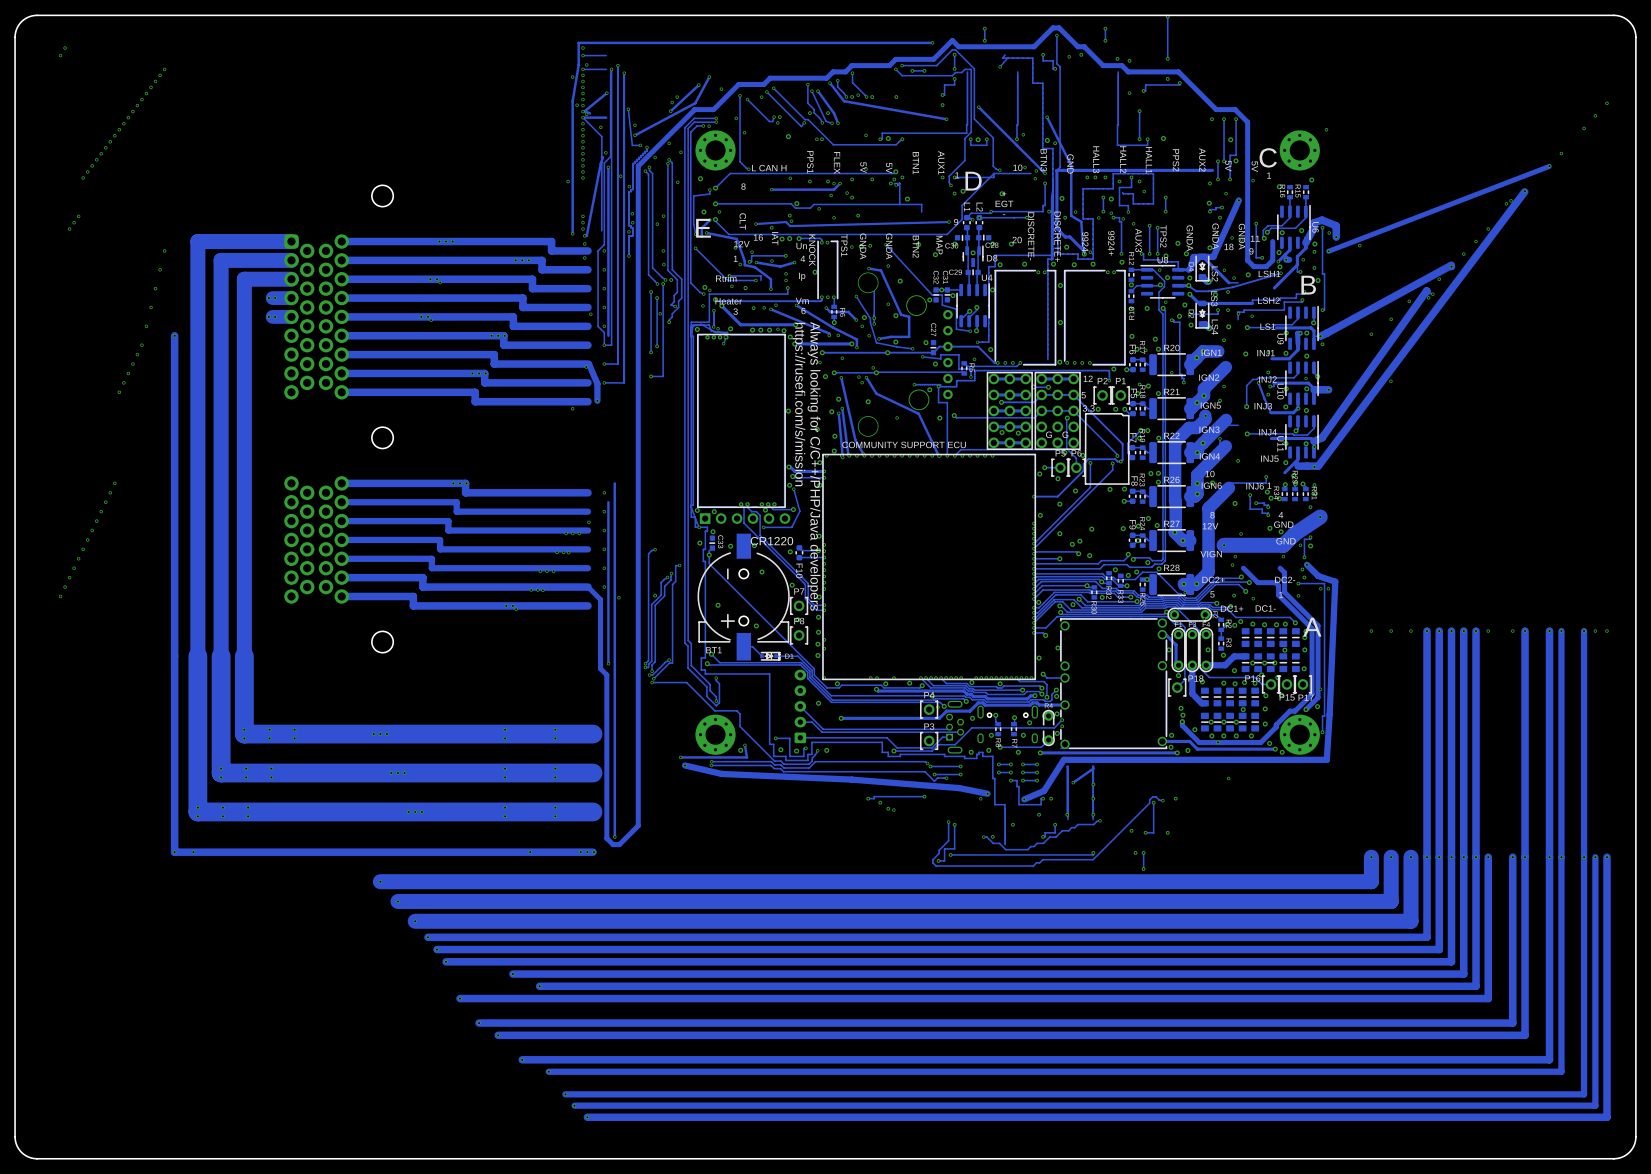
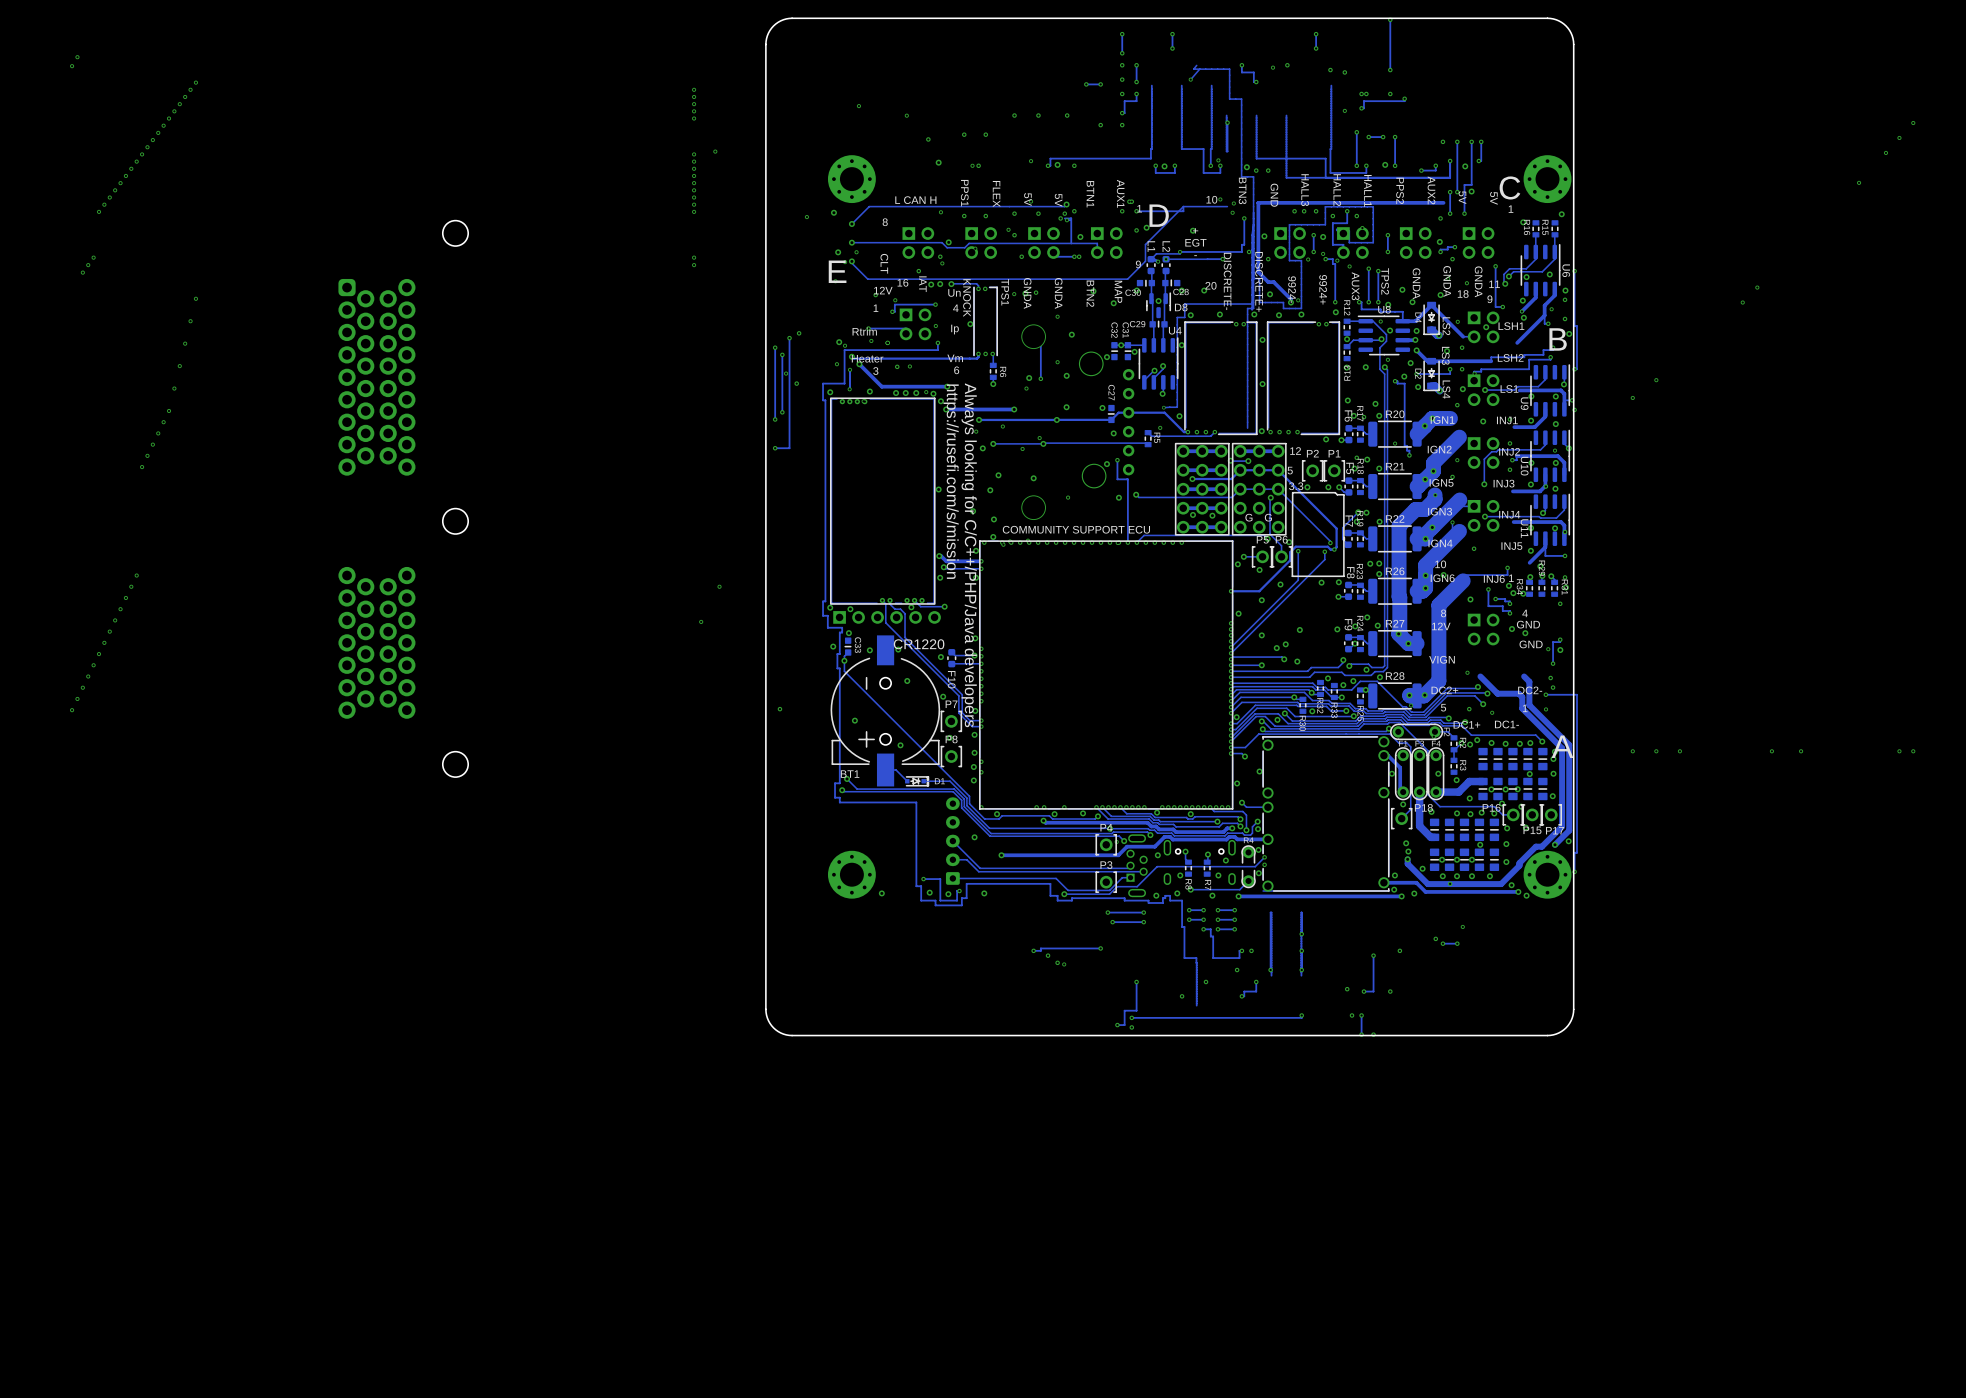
board edge: (1299, 15) (1613, 15) (1625, 18) (1634, 30) (1635, 1136) (1633, 1146) (1629, 1152) (1623, 1156) (1613, 1158) (37, 1158) (25, 1155) (18, 1148) (15, 1136) (15, 37) (18, 25) (25, 18) (37, 15) (665, 15) -> (1547, 18) (1558, 20) (1566, 25) (1572, 35) (1573, 44) (1573, 1009) (1572, 1018) (1566, 1027) (1558, 1032) (1547, 1035) (792, 1035) (780, 1032) (771, 1025) (765, 1009) (765, 44) (767, 35) (773, 25) (783, 19) (792, 18)
track: none -> (1122, 34) (1122, 53)
via: none -> (1122, 34)
track: (1056, 35) (1056, 63) (1060, 66) (1060, 167) (1056, 170) -> none
via: (1056, 35) -> none
track: (932, 42) (578, 42) (578, 64) (572, 101) (572, 233) -> none
via: (932, 42) -> none
via: none -> (1122, 53)
via: (582, 48) -> none
via: none -> (1122, 65)
via: (582, 55) -> none
track: (606, 55) (582, 55) -> none
via: (586, 64) -> none
track: (617, 65) (617, 364) (604, 364) -> none
via: (617, 65) -> none
track: (902, 65) (936, 65) (952, 49) (955, 49) (974, 68) (974, 119) (993, 137) (993, 166) (999, 170) -> none
via: (902, 65) -> none
via: none -> (1122, 79)
via: (582, 69) -> none
track: (606, 69) (582, 69) -> none
track: (611, 69) (610, 156) (604, 163) (604, 244) (598, 250) (598, 326) (604, 332) (604, 345) (611, 345) (611, 69) -> none
via: (611, 69) -> none
track: (895, 69) (902, 75) (952, 75) (955, 72) (971, 69) (971, 132) (964, 138) (964, 160) (949, 176) (951, 185) -> none
via: (895, 69) -> none
track: none -> (1181, 85) (1181, 149) (1203, 149) (1203, 172) (1220, 172) (1220, 165)
track: (624, 73) (624, 382) (604, 382) -> none
via: (624, 73) -> none
track: (852, 73) (852, 82) (866, 97) -> none
via: (852, 73) -> none
via: (572, 77) -> none
track: (709, 77) (695, 103) (634, 135) -> none
via: (709, 77) -> none
via: none -> (1122, 93)
via: none -> (1361, 93)
via: none -> (1366, 93)
track: (837, 80) (837, 86) (846, 97) -> none
via: (837, 80) -> none
track: (830, 83) (844, 101) (946, 119) -> none
via: (830, 83) -> none
track: (807, 84) (807, 103) (822, 122) -> none
via: (807, 84) -> none
track: (698, 85) (670, 111) -> none
via: (698, 85) -> none
track: (773, 88) (833, 144) (896, 144) (902, 139) -> none
via: (773, 88) -> none
track: (811, 91) (825, 121) (832, 123) -> none
via: (811, 91) -> none
track: (817, 91) (834, 113) (838, 123) -> none
via: (817, 91) -> none
track: (766, 92) (801, 126) (804, 122) -> none
via: (766, 92) -> none
track: (606, 93) (584, 111) (589, 113) -> none
via: (606, 93) -> none
track: (740, 95) (740, 161) (748, 169) -> none
via: (740, 95) -> none
via: (858, 95) -> none
via: (677, 97) -> none
via: (846, 97) -> none
via: (866, 97) -> none
track: none -> (1226, 115) (1226, 151) (1227, 122)
track: none -> (1256, 115) (1256, 158) (1325, 158) (1325, 177)
track: none -> (1286, 115) (1286, 177) (1450, 177) (1450, 161)
track: (747, 99) (769, 121) (772, 121) (774, 117) -> none
via: (747, 99) -> none
via: (672, 102) -> none
via: none -> (1227, 122)
via: (577, 105) -> none
via: (582, 105) -> none
via: none -> (1100, 125)
track: (978, 107) (1045, 173) -> none
via: (978, 107) -> none
track: (628, 109) (632, 145) (640, 145) -> none
via: (628, 109) -> none
via: (582, 111) -> none
via: (670, 111) -> none
via: (586, 114) -> none
via: none -> (1368, 137)
track: none -> (1383, 137) (1368, 137)
via: none -> (1383, 137)
track: none -> (1395, 137) (1395, 165)
via: none -> (1395, 137)
via: (582, 117) -> none
track: (606, 117) (582, 117) (601, 136) (601, 230) -> none
via: (774, 117) -> none
track: (1047, 117) (1071, 165) (1071, 215) (1081, 221) (1083, 251) (1083, 248) -> none
via: (1047, 117) -> none
track: (716, 118) (694, 118) (684, 127) (684, 642) (688, 646) (688, 668) (706, 686) (706, 696) (716, 705) (719, 702) (719, 683) (716, 678) -> none
via: (716, 118) -> none
via: (736, 118) -> none
via: (946, 119) -> none
track: none -> (1481, 141) (1481, 161) (1478, 161)
via: none -> (1481, 141)
track: (716, 122) (694, 122) (688, 128) (688, 640) (691, 643) (691, 665) (710, 684) (710, 690) (716, 697) (716, 701) -> none
via: (716, 122) -> none
via: (777, 122) -> none
via: (804, 122) -> none
via: (822, 122) -> none
via: (582, 123) -> none
via: (832, 123) -> none
via: (838, 123) -> none
via: (634, 125) -> none
track: (703, 125) (697, 125) (690, 132) (690, 282) (703, 294) -> none
via: (703, 125) -> none
via: (709, 126) -> none
via: (1326, 129) -> none
via: (744, 132) -> none
via: (634, 135) -> none
via: none -> (1450, 161)
via: none -> (1478, 161)
via: none -> (1220, 165)
via: none -> (1395, 165)
track: none -> (1435, 165) (1435, 170) (1421, 170)
via: none -> (1435, 165)
via: (669, 143) -> none
via: none -> (1268, 170)
via: none -> (1421, 170)
via: (640, 145) -> none
track: (647, 147) (647, 151) (632, 163) (632, 189) (628, 191) (628, 225) (632, 227) (632, 235) (628, 235) (628, 255) -> none
via: (647, 147) -> none
via: (605, 152) -> none
via: (680, 152) -> none
track: (601, 157) (586, 235) (584, 235) -> none
via: (655, 157) -> none
track: (669, 159) (672, 163) (672, 269) (681, 279) (681, 298) (678, 301) (678, 307) (672, 313) (669, 322) -> none
via: (669, 159) -> none
track: (667, 163) (667, 270) (677, 279) (677, 292) (671, 304) (675, 306) -> none
via: (667, 163) -> none
track: (1549, 166) (1328, 251) -> none
via: (1549, 166) -> none
track: (608, 167) (608, 335) -> none
via: (608, 167) -> none
track: (649, 167) (652, 173) (652, 267) (665, 279) -> none
via: (649, 167) -> none
via: (748, 169) -> none
via: none -> (1129, 201)
via: none -> (1131, 201)
via: (999, 170) -> none
track: (645, 171) (648, 174) (648, 274) (657, 284) -> none
via: (645, 171) -> none
via: (1045, 173) -> none
via: (620, 176) -> none
via: (1252, 180) -> none
via: (568, 181) -> none
via: (834, 183) -> none
track: (840, 183) (834, 189) (771, 189) -> none
via: (840, 183) -> none
via: (951, 185) -> none
via: (629, 186) -> none
via: (771, 189) -> none
track: (709, 190) (709, 194) (693, 196) (695, 234) -> none
via: (709, 190) -> none
track: (1524, 191) (1318, 466) (1298, 466) -> none
via: (1525, 191) -> none
via: (1226, 193) -> none
via: (831, 195) -> none
track: (1238, 200) (1213, 256) (1193, 256) (1188, 269) -> none
via: (1238, 200) -> none
via: (1511, 200) -> none
via: (1506, 203) -> none
part: none -> (918, 243)
part: none -> (981, 243)
part: none -> (1043, 243)
part: none -> (1106, 243)
part: none -> (1290, 243)
part: none -> (1352, 243)
part: none -> (1415, 243)
part: none -> (1478, 243)
track: none -> (1053, 252) (1053, 256) (1074, 256)
via: (1075, 212) -> none
via: (632, 213) -> none
via: none -> (1074, 256)
via: none -> (1079, 256)
via: (663, 216) -> none
via: (834, 217) -> none
track: (709, 220) (701, 228) (701, 236) -> none
via: (632, 222) -> none
track: (948, 222) (790, 226) (786, 222) (755, 224) -> none
via: (948, 222) -> none
via: (657, 224) -> none
via: (755, 224) -> none
via: (582, 228) -> none
via: (1488, 228) -> none
via: (628, 231) -> none
track: (706, 232) (736, 239) (744, 265) (754, 267) (770, 279) (770, 289) -> none
via: (706, 232) -> none
via: (1329, 232) -> none
via: (572, 233) -> none
via: (695, 234) -> none
via: (584, 235) -> none
track: (1336, 237) (1336, 225) (1322, 220) (1313, 223) (1313, 228) (1305, 242) -> none
via: (1336, 237) -> none
via: (1241, 239) -> none
track: (291, 241) (197, 241) (197, 811) (593, 811) -> none
track: (341, 241) (551, 241) (551, 250) (588, 250) -> none
via: (439, 241) -> none
via: (446, 241) -> none
via: (452, 241) -> none
track: (1272, 241) (1272, 260) (1266, 266) (1253, 266) (1247, 260) (1247, 122) (1235, 109) (1216, 109) (1178, 71) (1128, 71) (1122, 65) (1103, 65) (1084, 46) (1078, 46) (1059, 27) (1052, 27) (1034, 46) (958, 46) (952, 40) (933, 59) (895, 59) (889, 65) (851, 65) (845, 71) (833, 71) (826, 78) (770, 78) (763, 84) (738, 84) (713, 109) (694, 109) (638, 166) (638, 825) (619, 844) (613, 844) (606, 838) (606, 675) (600, 668) (600, 599) (588, 587) (422, 587) (422, 577) (341, 577) -> none
via: (584, 243) -> none
track: (886, 244) (932, 295) (942, 295) (942, 305) (956, 309) (956, 329) (970, 331) -> none
via: (886, 244) -> none
via: (1359, 245) -> none
track: (695, 248) (727, 280) (755, 280) -> none
via: (695, 248) -> none
via: (604, 250) -> none
via: (663, 250) -> none
via: (1328, 251) -> none
via: (628, 255) -> none
track: (1284, 255) (1289, 259) (1286, 259) -> none
via: (584, 257) -> none
via: (1286, 259) -> none
track: (291, 260) (221, 260) (221, 773) (593, 773) -> none
track: (341, 260) (542, 260) (542, 269) (588, 269) -> none
via: (515, 260) -> none
via: (522, 260) -> none
via: (528, 260) -> none
via: (771, 261) -> none
via: (756, 262) -> none
track: (794, 262) (780, 266) (756, 262) -> none
via: (794, 262) -> none
via: (663, 264) -> none
via: (740, 264) -> none
track: (1451, 266) (1320, 336) -> none
via: (1451, 266) -> none
track: (868, 268) (881, 270) (901, 314) (909, 316) (909, 336) (879, 338) -> none
via: (868, 268) -> none
via: (604, 269) -> none
part: none -> (915, 324)
track: (1281, 273) (1232, 287) (1208, 291) (1196, 291) (1188, 285) -> none
via: (1281, 273) -> none
part: none -> (1483, 327)
via: (1234, 278) -> none
track: (291, 279) (244, 279) (244, 734) (593, 734) -> none
track: (341, 279) (532, 279) (532, 288) (588, 288) -> none
via: (430, 279) -> none
via: (436, 279) -> none
via: (665, 279) -> none
via: (1439, 279) -> none
via: (755, 280) -> none
via: (786, 280) -> none
via: (440, 282) -> none
via: (657, 284) -> none
via: (604, 288) -> none
via: (770, 289) -> none
via: (703, 294) -> none
track: (1432, 294) (1426, 290) (1322, 437) (1313, 441) -> none
via: (1432, 294) -> none
track: (856, 296) (870, 318) (876, 342) (912, 348) -> none
via: (856, 296) -> none
via: (1428, 297) -> none
via: (268, 298) -> none
via: (275, 298) -> none
track: (291, 298) (272, 298) -> none
track: (341, 298) (522, 298) (522, 307) (588, 307) -> none
via: (1409, 301) -> none
via: (775, 305) -> none
track: (796, 305) (856, 339) (856, 347) -> none
via: (796, 305) -> none
via: (675, 306) -> none
via: (604, 307) -> none
track: (826, 308) (830, 312) (848, 312) (856, 320) -> none
via: (826, 308) -> none
track: (770, 309) (829, 333) (829, 335) -> none
via: (770, 309) -> none
via: (590, 314) -> none
track: (874, 314) (874, 323) -> none
via: (268, 316) -> none
via: (275, 316) -> none
track: (291, 316) (272, 316) -> none
track: (341, 316) (513, 316) (513, 326) (588, 326) -> none
via: (421, 316) -> none
via: (427, 316) -> none
via: (1252, 316) -> none
via: (431, 320) -> none
via: (856, 320) -> none
via: (874, 323) -> none
via: (604, 326) -> none
part: none -> (1483, 390)
via: (718, 328) -> none
via: (970, 331) -> none
track: (1300, 333) (1297, 333) (1298, 343) -> none
via: (1300, 333) -> none
track: (174, 335) (174, 852) (593, 852) -> none
via: (174, 335) -> none
track: (341, 335) (503, 335) (503, 345) (588, 345) -> none
via: (491, 335) -> none
via: (498, 335) -> none
via: (504, 335) -> none
via: (829, 335) -> none
via: (838, 335) -> none
via: (869, 335) -> none
track: (725, 337) (725, 333) (711, 331) (709, 325) (693, 325) (691, 337) -> none
via: (879, 338) -> none
track: (723, 343) (727, 332) (715, 332) (701, 324) (691, 326) (691, 507) (699, 527) -> none
via: (723, 343) -> none
via: (604, 345) -> none
via: (856, 347) -> none
via: (912, 348) -> none
track: (341, 354) (494, 354) (494, 364) (588, 364) (597, 383) (597, 400) -> none
track: (922, 356) (940, 358) (940, 354) (958, 354) (958, 368) (970, 368) (970, 376) -> none
via: (922, 356) -> none
via: (604, 364) -> none
via: (586, 367) -> none
track: (341, 373) (484, 373) (484, 382) (588, 382) -> none
via: (472, 373) -> none
via: (479, 373) -> none
via: (485, 373) -> none
via: (970, 376) -> none
track: (841, 377) (855, 440) (863, 454) -> none
via: (841, 377) -> none
track: (866, 377) (876, 393) (918, 413) (938, 456) -> none
via: (866, 377) -> none
track: (1109, 380) (1109, 370) (974, 370) (974, 380) (956, 380) (956, 386) (914, 384) -> none
via: (1109, 380) -> none
part: none -> (1483, 453)
via: (1390, 381) -> none
via: (604, 382) -> none
via: (862, 382) -> none
track: (1258, 382) (1270, 412) -> none
via: (1258, 382) -> none
via: (914, 384) -> none
track: (1328, 389) (1313, 389) -> none
via: (1328, 389) -> none
track: (341, 392) (475, 392) (475, 401) (588, 401) -> none
via: (597, 400) -> none
via: (572, 408) -> none
track: (842, 408) (848, 454) -> none
via: (842, 408) -> none
track: (838, 413) (842, 457) -> none
via: (838, 413) -> none
part: none -> (1483, 515)
track: (341, 483) (465, 483) (465, 492) (588, 492) -> none
via: (453, 483) -> none
via: (459, 483) -> none
via: (466, 483) -> none
track: (614, 483) (614, 837) -> none
track: (793, 489) (799, 511) (791, 527) (763, 527) -> none
via: (793, 489) -> none
track: (341, 502) (456, 502) (456, 511) (588, 511) -> none
track: (608, 502) (608, 663) -> none
via: (604, 511) -> none
track: (1320, 517) (1294, 533) (1283, 545) (1224, 545) -> none
via: (1320, 517) -> none
track: (341, 521) (448, 521) (448, 530) (588, 530) -> none
via: (699, 527) -> none
via: (763, 527) -> none
part: none -> (1483, 629)
via: (604, 530) -> none
via: (566, 533) -> none
via: (572, 533) -> none
via: (579, 533) -> none
via: (1241, 533) -> none
track: (341, 539) (440, 539) (440, 549) (588, 549) -> none
via: (1224, 545) -> none
via: (604, 549) -> none
track: (655, 549) (648, 553) (648, 660) (645, 663) -> none
via: (655, 549) -> none
via: (557, 552) -> none
via: (563, 552) -> none
via: (568, 552) -> none
via: (1235, 556) -> none
via: (1283, 556) -> none
track: (341, 558) (431, 558) (431, 568) (588, 568) -> none
track: (1307, 564) (1318, 576) (1335, 581) (1326, 759) (1063, 759) (1044, 790) (1024, 799) -> none
via: (1307, 564) -> none
track: (679, 565) (675, 565) (675, 581) (672, 584) (672, 663) (669, 663) (653, 678) -> none
via: (679, 565) -> none
via: (604, 568) -> none
via: (540, 571) -> none
via: (547, 571) -> none
via: (553, 571) -> none
track: (671, 573) (670, 580) (664, 586) (664, 595) (655, 605) (655, 661) (652, 664) (652, 671) -> none
via: (671, 573) -> none
track: (667, 577) (661, 582) (661, 595) (651, 604) (651, 661) (648, 667) (645, 667) -> none
via: (667, 577) -> none
via: (604, 587) -> none
via: (1320, 588) -> none
via: (1328, 588) -> none
via: (531, 590) -> none
via: (537, 590) -> none
via: (542, 590) -> none
track: (341, 596) (413, 596) (413, 605) (588, 605) -> none
via: (618, 597) -> none
via: (506, 605) -> none
via: (512, 605) -> none
via: (516, 609) -> none
track: (1427, 631) (1427, 937) (427, 937) -> none
via: (1427, 631) -> none
track: (1439, 631) (1439, 949) (436, 949) -> none
via: (1439, 631) -> none
track: (1451, 631) (1451, 961) (446, 961) -> none
via: (1451, 631) -> none
track: (1463, 631) (1463, 974) (512, 974) -> none
via: (1463, 631) -> none
track: (1476, 631) (1476, 986) (539, 986) -> none
via: (1476, 631) -> none
track: (1525, 631) (1525, 1035) (498, 1035) -> none
via: (1525, 631) -> none
track: (1549, 631) (1549, 1059) (522, 1059) -> none
via: (1549, 631) -> none
track: (1561, 631) (1561, 1071) (548, 1071) -> none
via: (1561, 631) -> none
track: (1584, 631) (1584, 1094) (565, 1094) -> none
via: (1584, 631) -> none
track: (669, 660) (652, 675) (649, 675) -> none
via: (669, 660) -> none
via: (608, 663) -> none
via: (645, 663) -> none
via: (645, 667) -> none
via: (652, 671) -> none
via: (649, 675) -> none
via: (653, 678) -> none
via: (716, 678) -> none
track: (652, 682) (686, 682) (714, 710) (736, 710) (740, 713) (740, 726) (774, 761) (780, 761) (784, 764) (809, 764) (817, 750) -> none
via: (652, 682) -> none
via: (1320, 689) -> none
via: (716, 701) -> none
via: (244, 729) -> none
via: (269, 729) -> none
via: (294, 729) -> none
via: (505, 729) -> none
via: (555, 729) -> none
via: (373, 734) -> none
via: (380, 734) -> none
via: (386, 734) -> none
via: (244, 738) -> none
via: (269, 738) -> none
via: (294, 738) -> none
via: (505, 738) -> none
via: (555, 738) -> none
track: (744, 745) (746, 757) (680, 757) -> none
via: (744, 745) -> none
via: (817, 750) -> none
via: (680, 757) -> none
track: (711, 761) (771, 761) (784, 767) (809, 767) (815, 761) (925, 761) (927, 763) -> none
via: (711, 761) -> none
via: (927, 763) -> none
track: (685, 765) (721, 773) (851, 779) (959, 788) (987, 793) -> none
via: (685, 765) -> none
track: (711, 765) (771, 765) (783, 771) (924, 771) (934, 781) (937, 778) (946, 778) -> none
via: (711, 765) -> none
track: (1093, 766) (1093, 768) (1073, 782) -> none
via: (221, 768) -> none
via: (246, 768) -> none
via: (271, 768) -> none
via: (505, 768) -> none
via: (555, 768) -> none
via: (391, 773) -> none
via: (397, 773) -> none
via: (404, 773) -> none
via: (221, 777) -> none
via: (246, 777) -> none
via: (271, 777) -> none
via: (505, 777) -> none
via: (555, 777) -> none
via: (946, 778) -> none
via: (1073, 782) -> none
via: none -> (1435, 938)
via: none -> (1442, 943)
track: none -> (1457, 943) (1442, 943)
via: none -> (1457, 943)
via: (987, 793) -> none
via: (980, 798) -> none
via: (1024, 799) -> none
track: (1162, 800) (1152, 796) (1149, 803) (1093, 859) (1042, 859) (1033, 866) (936, 866) (932, 859) (948, 840) (948, 822) -> none
via: (1162, 800) -> none
via: (197, 807) -> none
via: (223, 807) -> none
via: (248, 807) -> none
via: (505, 807) -> none
via: (555, 807) -> none
via: (408, 811) -> none
via: (415, 811) -> none
via: (421, 811) -> none
via: (197, 816) -> none
via: (223, 816) -> none
via: (248, 816) -> none
via: (505, 816) -> none
via: (555, 816) -> none
track: (1100, 820) (1093, 824) (1078, 824) (1068, 830) (1062, 830) (1056, 837) (1049, 837) (1043, 843) (1037, 843) (1027, 849) (1005, 849) (999, 843) (993, 843) (986, 837) (983, 837) -> none
via: (1100, 820) -> none
via: (948, 822) -> none
via: (614, 837) -> none
via: (983, 837) -> none
via: (174, 852) -> none
via: (193, 852) -> none
via: (530, 852) -> none
via: (580, 852) -> none
via: (587, 852) -> none
via: (593, 852) -> none
track: (1371, 857) (1371, 881) (380, 881) -> none
via: (1371, 857) -> none
track: (1391, 857) (1391, 901) (397, 901) -> none
via: (1391, 857) -> none
track: (1410, 857) (1410, 921) (415, 921) -> none
via: (1410, 857) -> none
via: (1427, 857) -> none
via: (1439, 857) -> none
via: (1451, 857) -> none
via: (1463, 857) -> none
via: (1476, 857) -> none
track: (1488, 857) (1488, 998) (459, 998) -> none
via: (1488, 857) -> none
track: (1512, 857) (1512, 1023) (479, 1023) -> none
via: (1512, 857) -> none
via: (1525, 857) -> none
via: (1549, 857) -> none
via: (1561, 857) -> none
via: (1584, 857) -> none
track: (1595, 857) (1595, 1105) (574, 1105) -> none
via: (1595, 857) -> none
track: (1607, 857) (1607, 1117) (587, 1117) -> none
via: (1607, 857) -> none
via: none -> (1131, 1027)
via: none -> (1373, 1034)
via: (380, 881) -> none
via: (397, 901) -> none
via: (415, 921) -> none
via: (427, 937) -> none
via: (436, 949) -> none
via: (446, 961) -> none
via: (512, 974) -> none
via: (539, 986) -> none
via: (459, 998) -> none
via: (479, 1023) -> none
via: (498, 1035) -> none
via: (522, 1059) -> none
via: (548, 1071) -> none
via: (565, 1094) -> none
via: (574, 1105) -> none
via: (587, 1117) -> none

